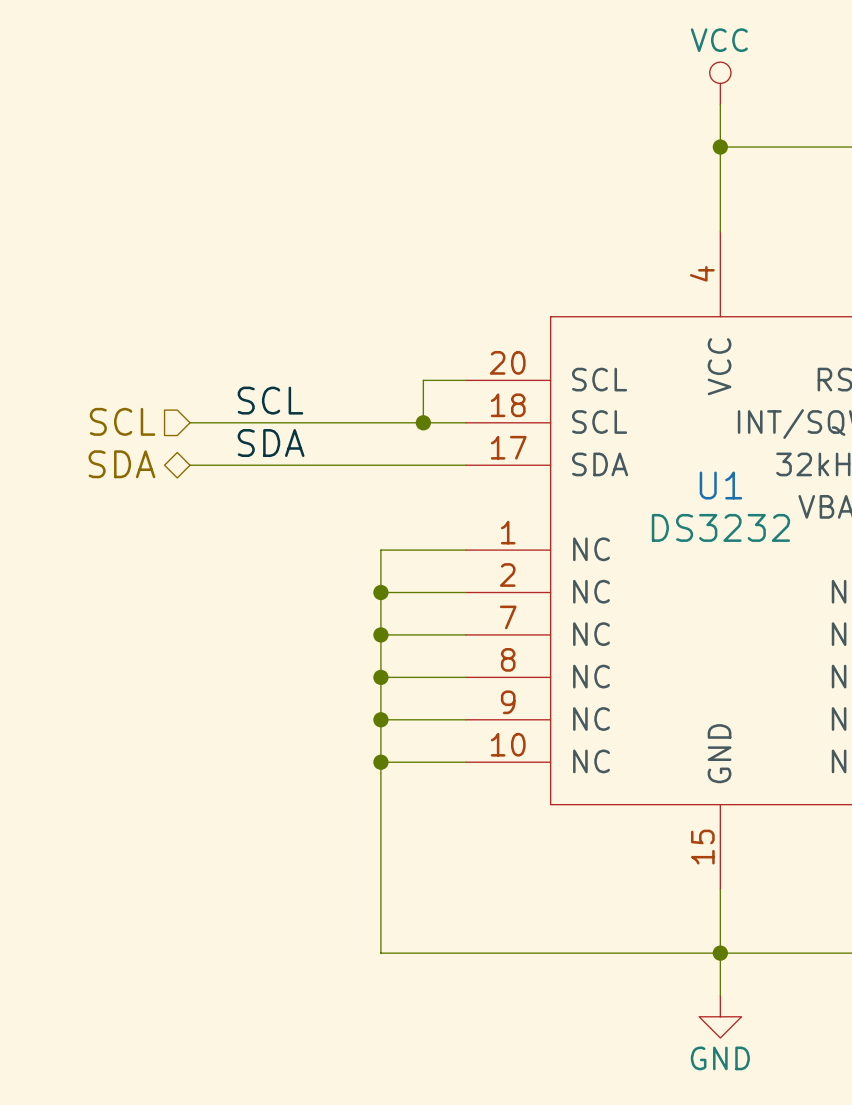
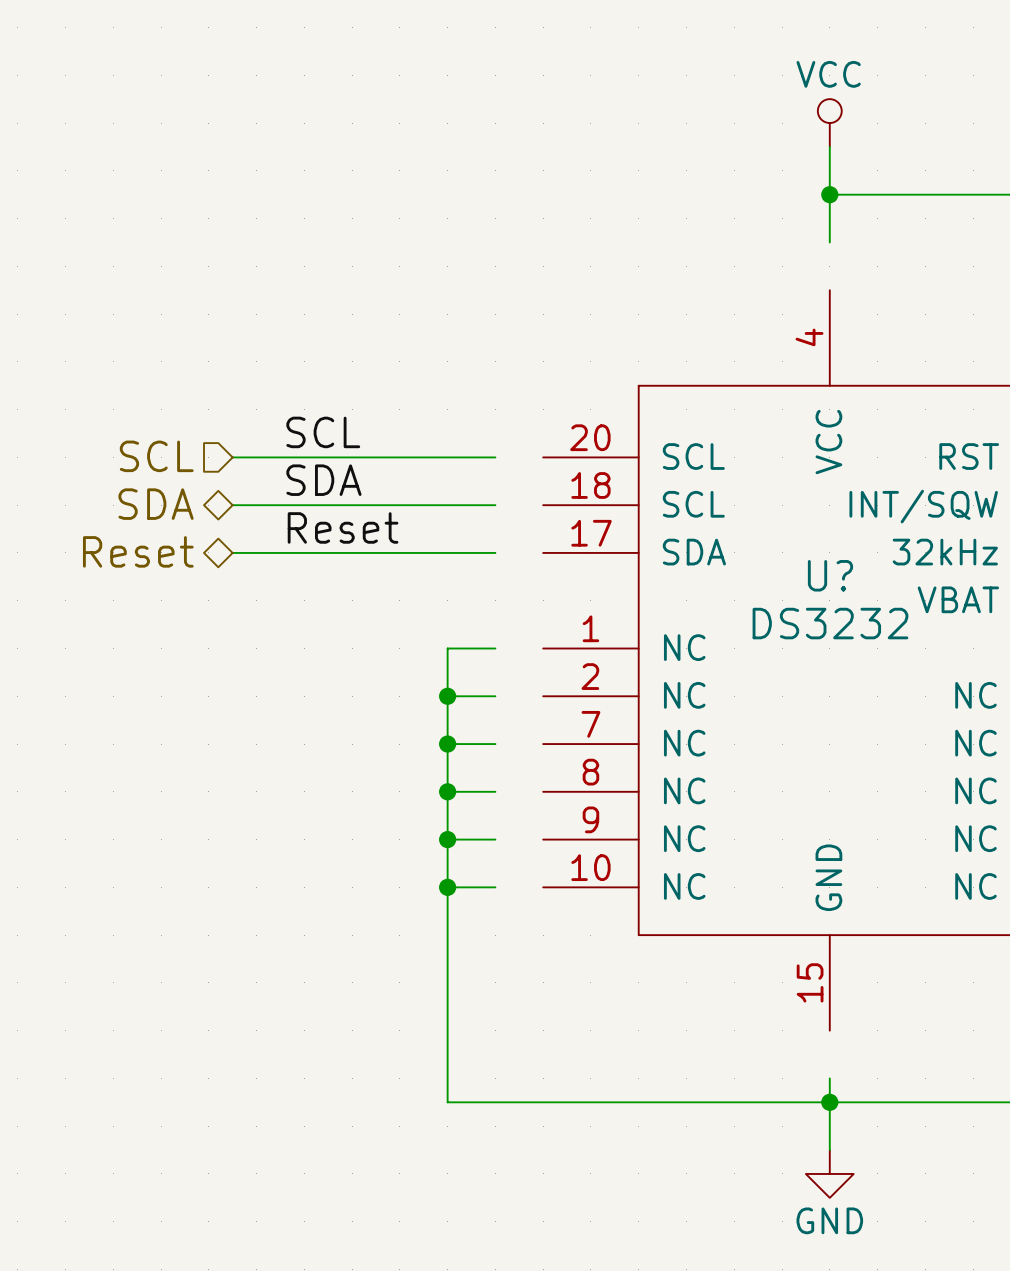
wire: (720, 189) (720, 231) -> none
label: none -> SCL (323, 432)
hierarchical label: none -> SCL (156, 456)
wire: none -> (232, 457) (495, 457)
wire: (465, 380) (423, 380) (423, 422) (465, 422) -> none
label: SCL (270, 400) -> SDA (323, 480)
hierarchical label shape: input (122, 421) -> bidirectional (156, 504)
hierarchical label: SCL (122, 421) -> SDA (156, 504)
junction: (423, 422) -> none
label: SDA (271, 443) -> Reset (343, 527)
hierarchical label: SDA (121, 464) -> Reset (138, 551)
wire: (423, 465) (465, 465) -> none
U1 name: U1 (720, 485) -> U? (830, 575)
wire: (423, 550) (465, 550) -> none
wire: (423, 592) (465, 592) -> none
wire: (423, 634) (465, 634) -> none
wire: (423, 677) (465, 677) -> none
wire: (423, 719) (465, 719) -> none
wire: (423, 762) (465, 762) -> none
wire: (720, 889) (720, 931) -> none

